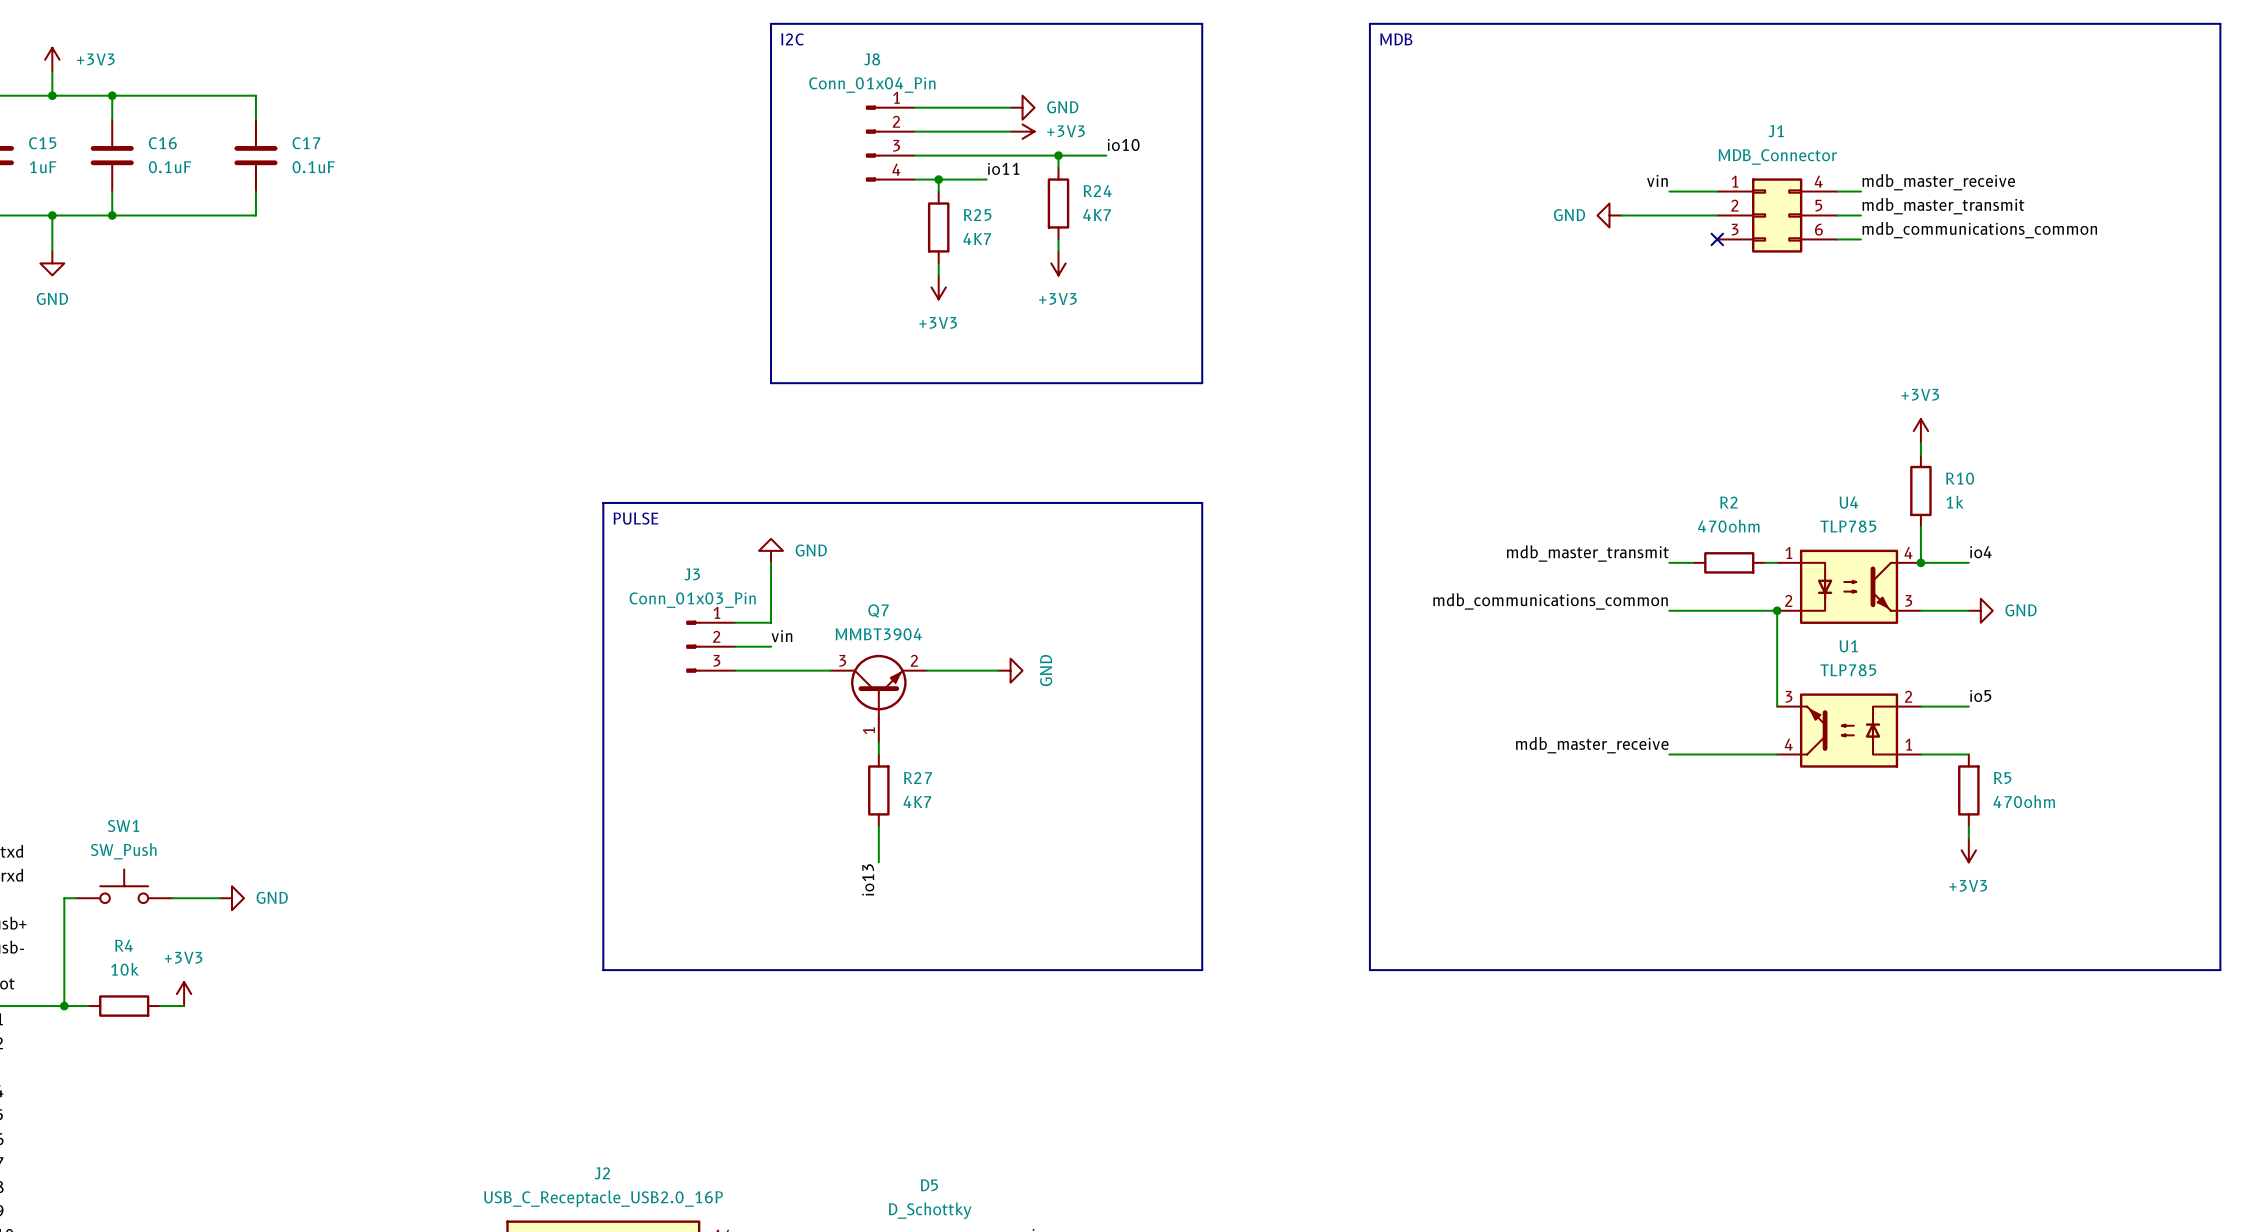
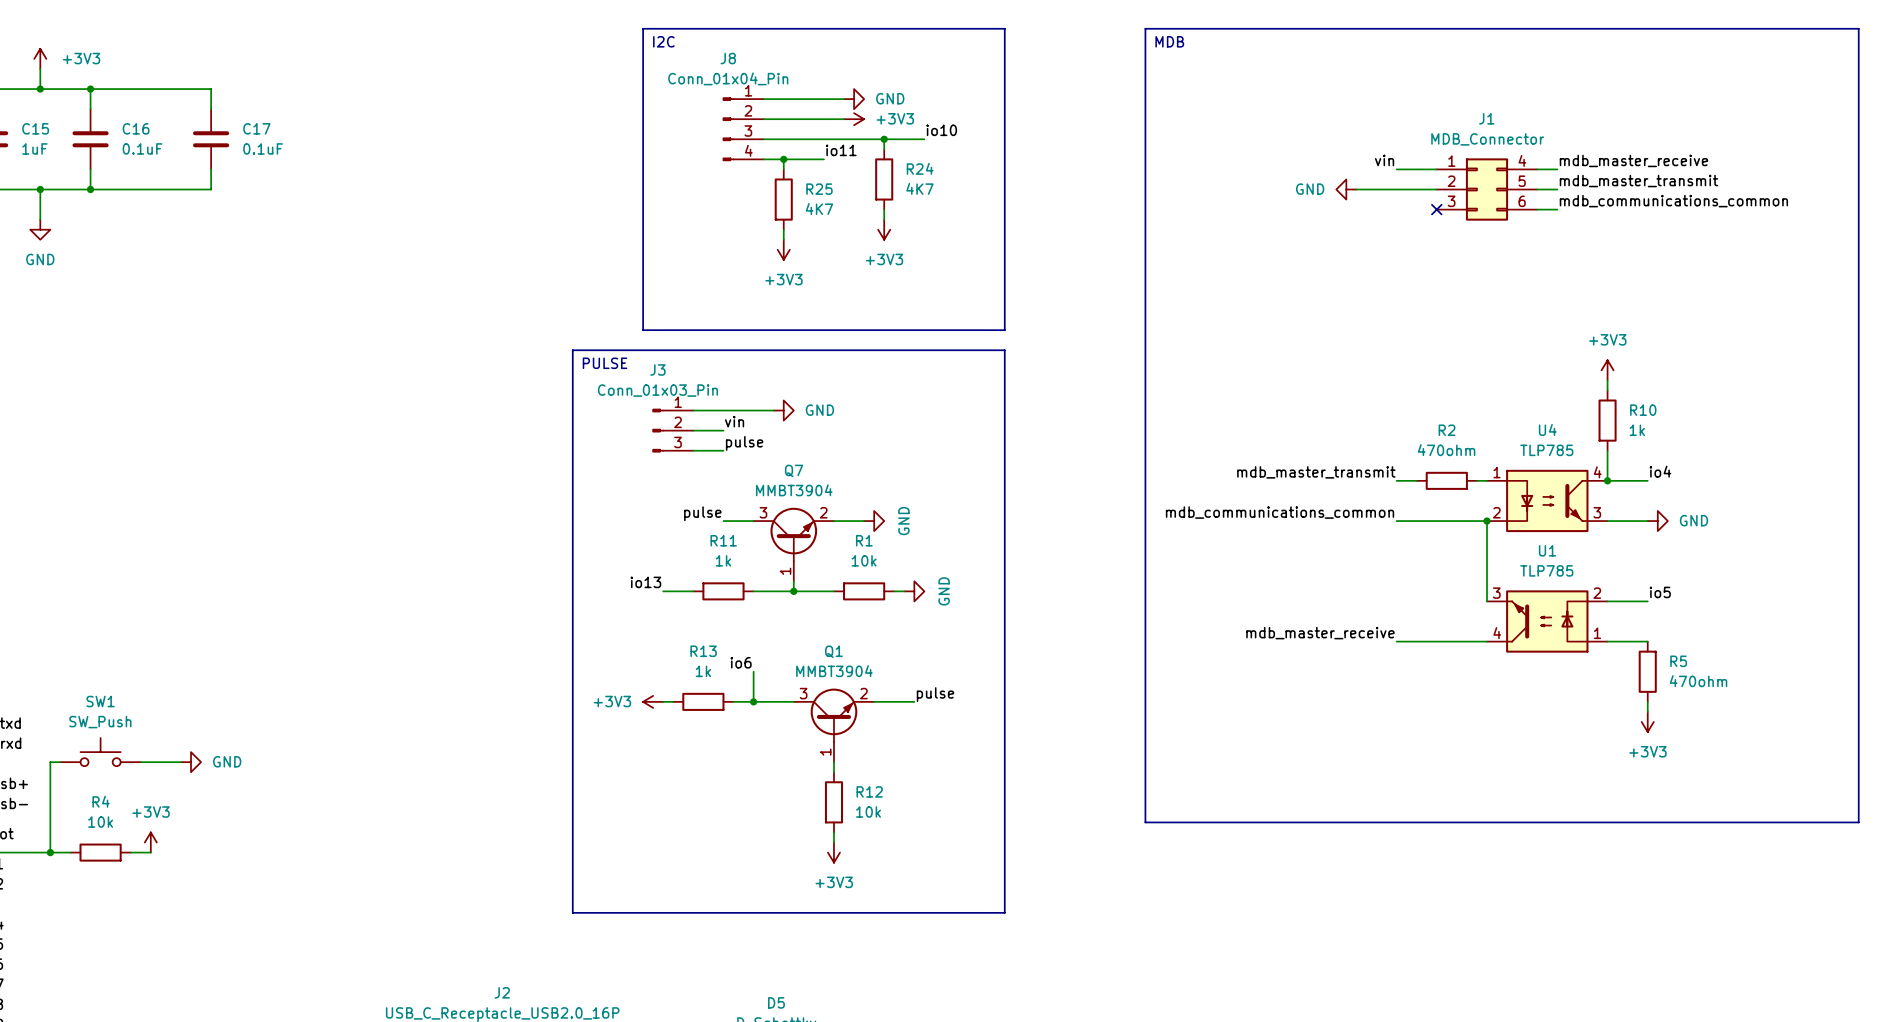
wire: none -> (693, 410) (773, 410)
power symbol: none -> GND (783, 410)
line: (1202, 502) (603, 502) (603, 970) (1202, 970) -> (1004, 430) (1004, 350) (572, 350) (572, 912) (1004, 912) (1004, 822)
label: none -> pulse (744, 443)
text position: PULSE (635, 518) -> PULSE (605, 363)
wire: none -> (693, 450) (723, 450)
power symbol: GND (771, 550) -> none
wire: (771, 562) (771, 622) (735, 622) -> none
label: none -> pulse (702, 513)
wire: none -> (723, 521) (753, 521)
wire: none -> (833, 521) (864, 521)
power symbol: none -> GND (874, 521)
label position: vin (781, 636) -> vin (734, 421)
J3 position: (710, 646) -> (672, 430)
wire: (735, 646) (771, 646) -> (663, 591) (693, 591)
wire: (735, 670) (830, 670) -> (753, 591) (833, 591)
wire: (926, 670) (998, 670) -> none
power symbol: GND (1010, 670) -> none
R11: none -> 1k (723, 591)
junction: none -> (793, 591)
R1: none -> 10k (864, 591)
wire: none -> (894, 591) (904, 591)
power symbol: none -> GND (914, 591)
Q7 position: (878, 698) -> (793, 544)
wire: (878, 742) (878, 754) -> (793, 581) (793, 591)
label: none -> io6 (741, 662)
R27: 4K7 (878, 790) -> none
wire: none -> (753, 671) (753, 701)
label: none -> pulse (935, 694)
power symbol: none -> +3V3 (653, 701)
wire: none -> (663, 701) (673, 701)
R13: none -> 1k (703, 701)
wire: (878, 826) (878, 862) -> (733, 701) (793, 701)
junction: none -> (753, 701)
wire: none -> (874, 701) (914, 701)
Q1: none -> MMBT3904 (833, 725)
label rotation: 0° (868, 879) -> 90° clockwise (645, 582)
label position: io13 (868, 879) -> io13 (645, 582)
wire: none -> (833, 762) (833, 772)
R12: none -> 10k (833, 802)
wire: none -> (833, 832) (833, 842)
power symbol: none -> +3V3 (833, 852)

